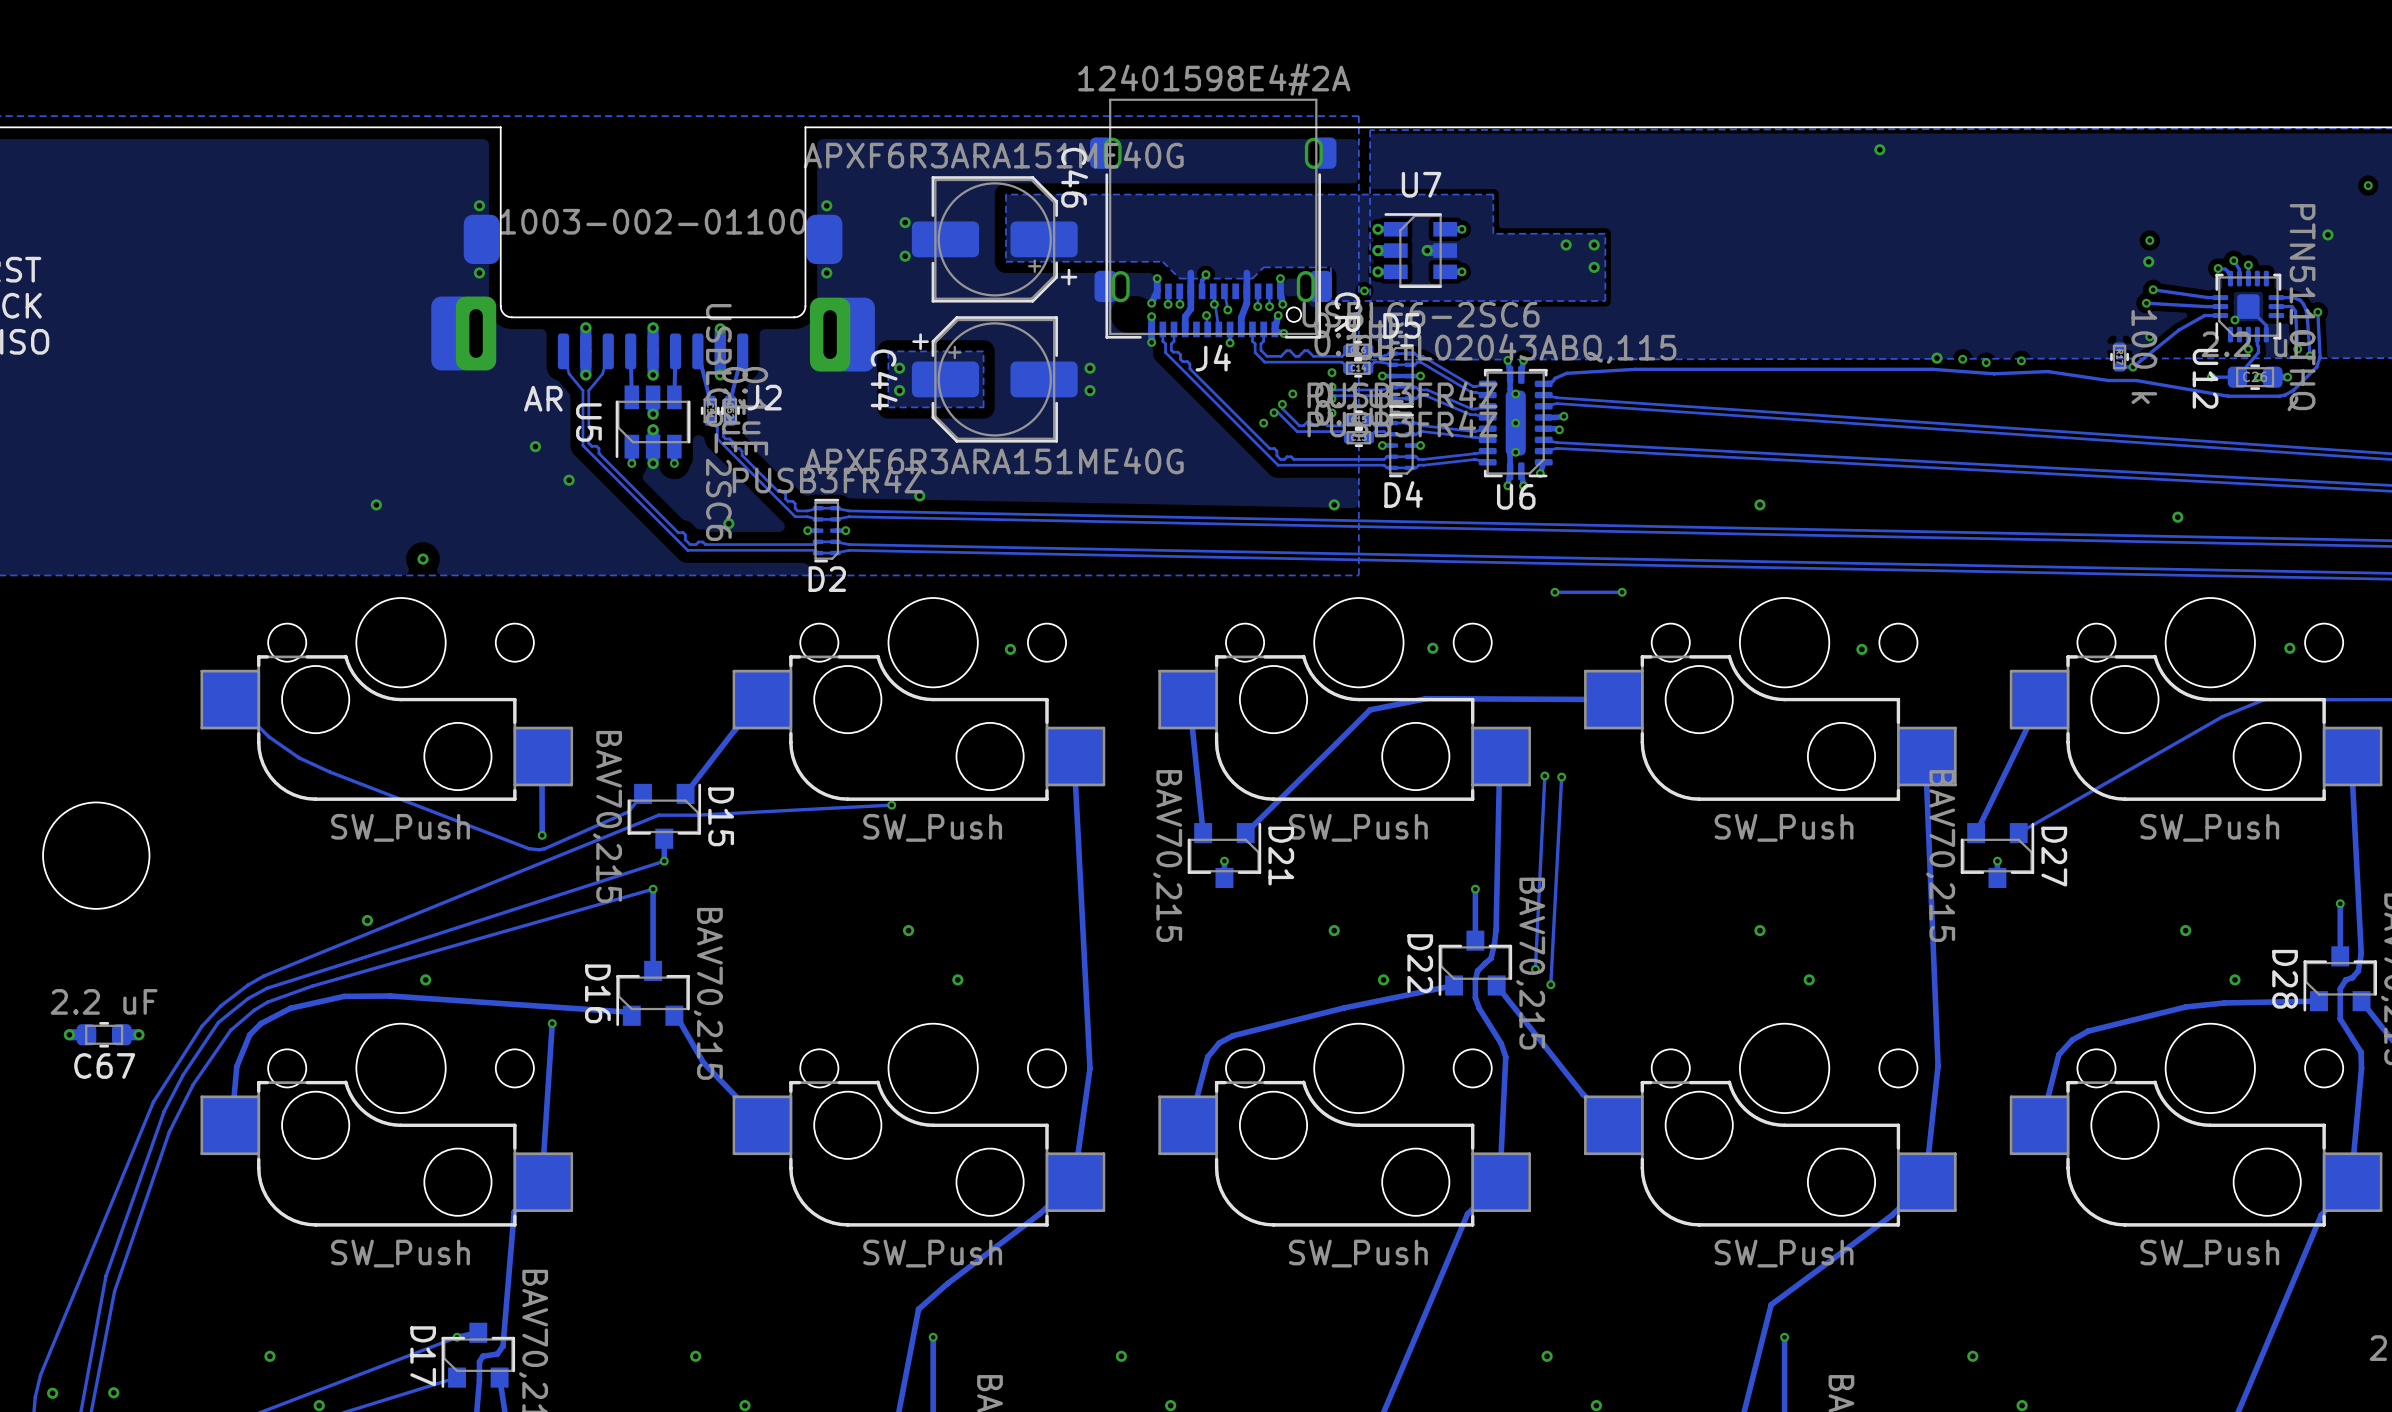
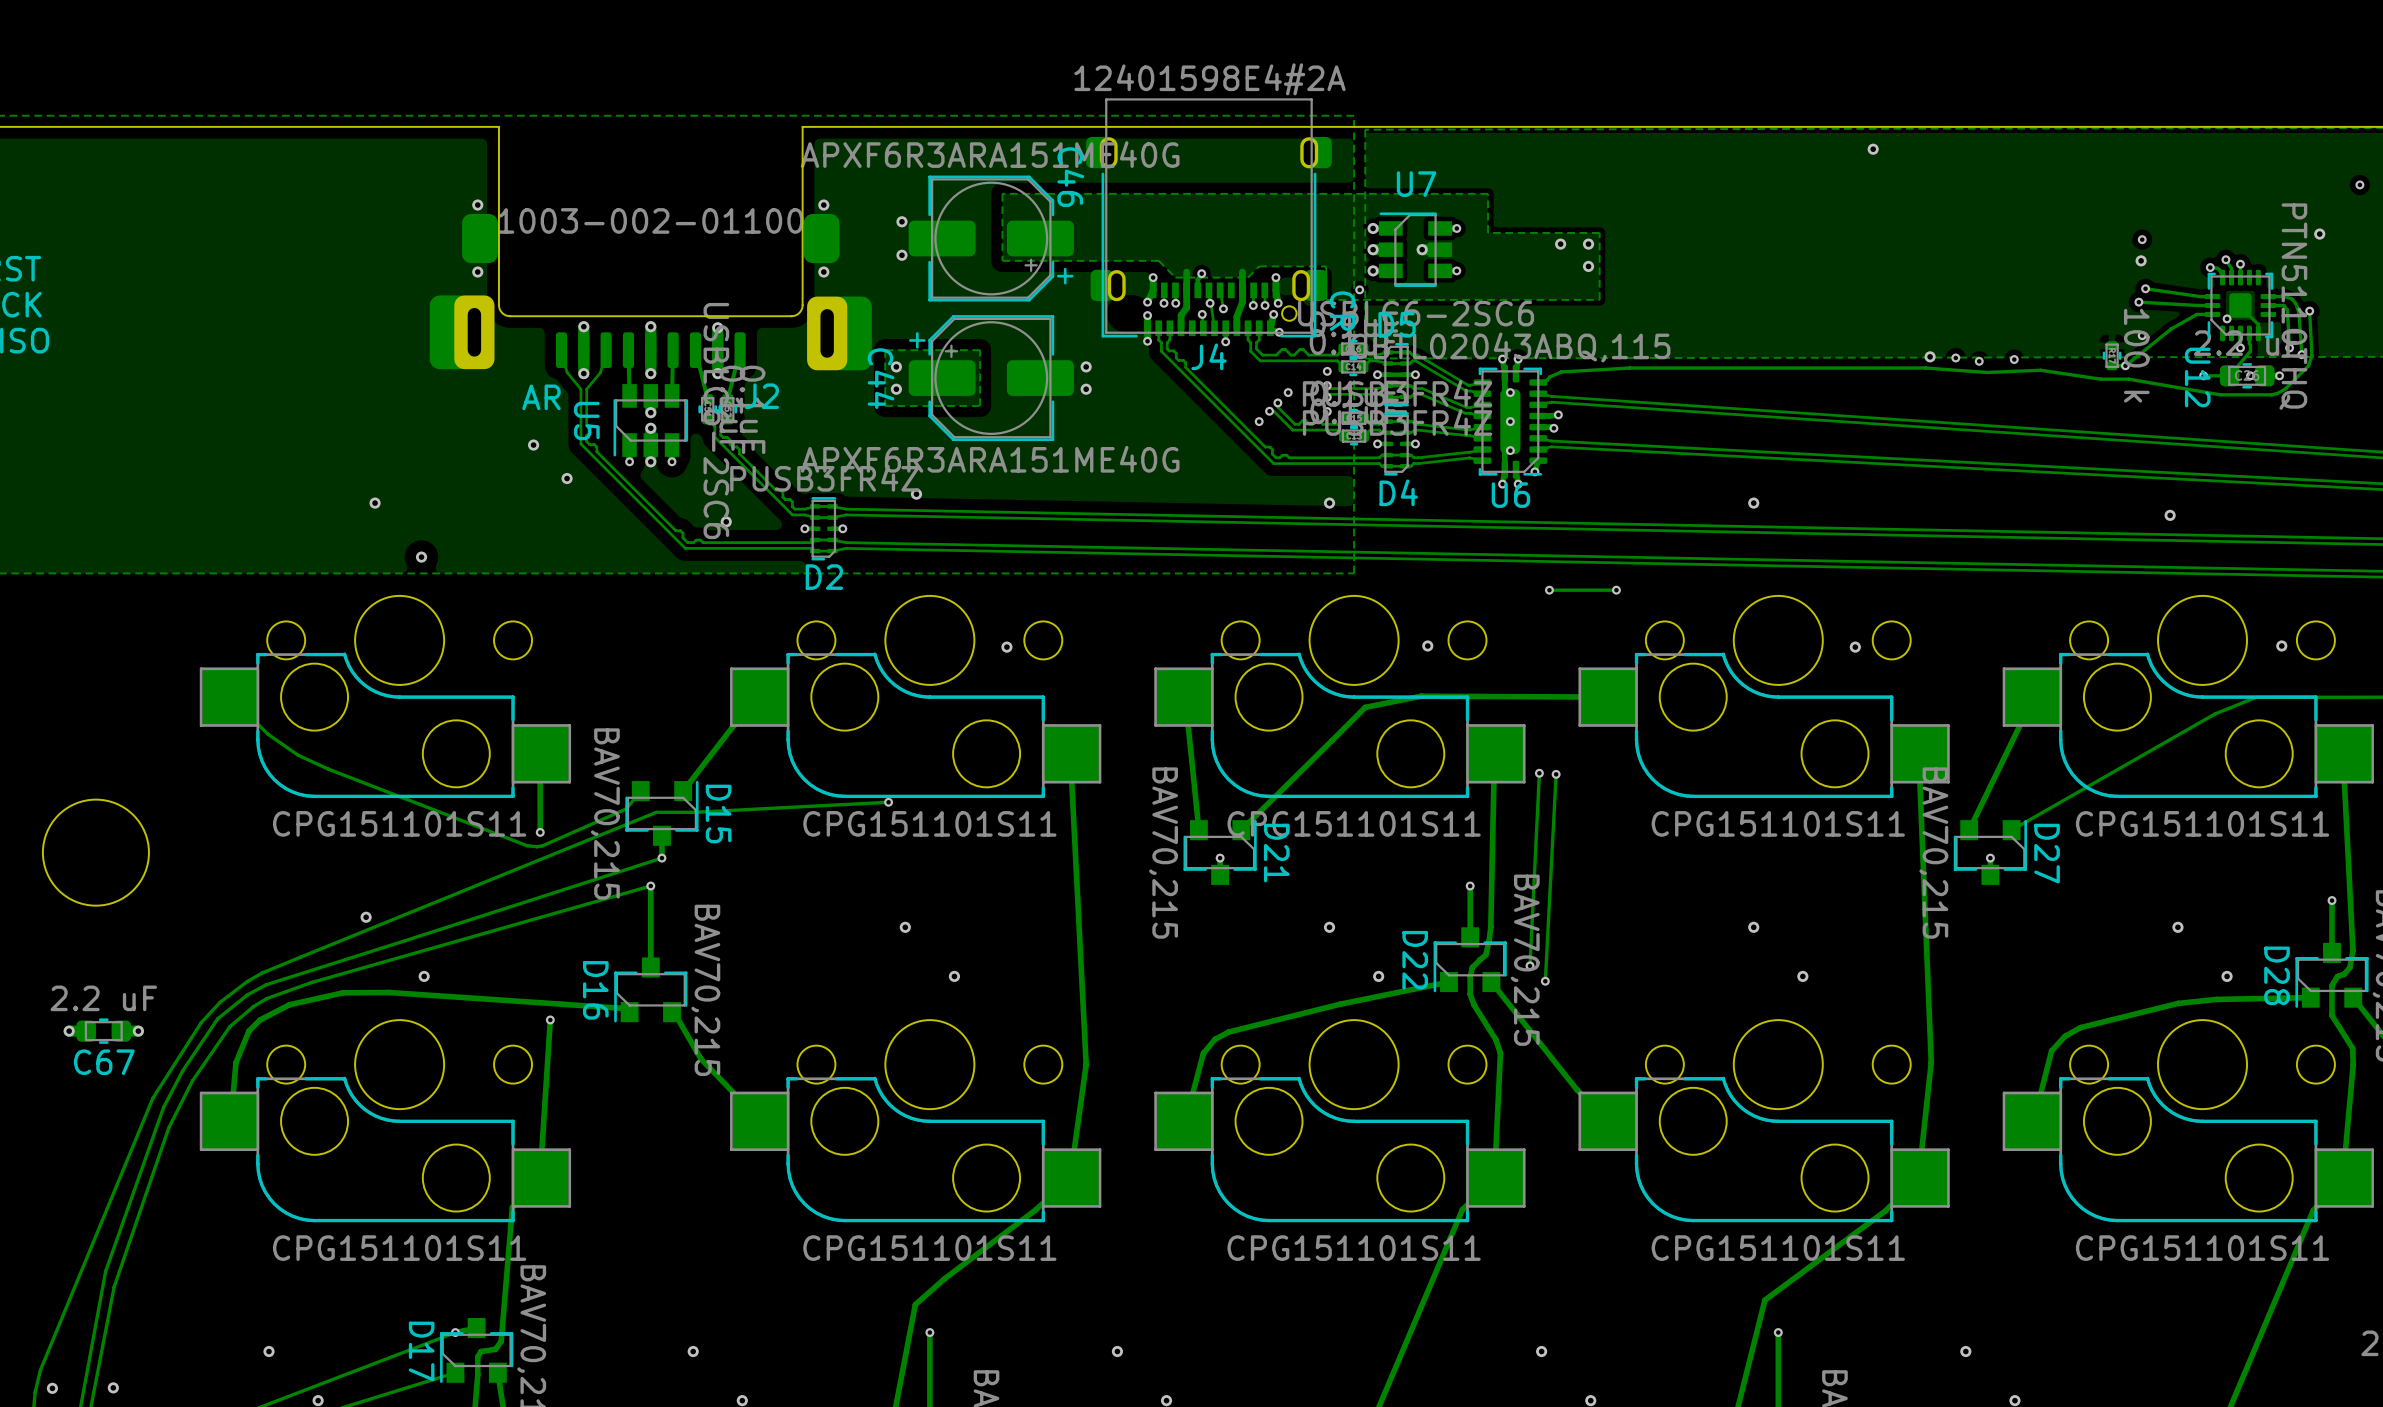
part value: SW_Push (400, 827) -> CPG151101S11 (399, 823)
part value: SW_Push (932, 827) -> CPG151101S11 (929, 823)
part value: SW_Push (1358, 827) -> CPG151101S11 (1354, 823)
part value: SW_Push (1784, 827) -> CPG151101S11 (1778, 823)
part value: SW_Push (2209, 827) -> CPG151101S11 (2202, 823)
part value: SW_Push (400, 1253) -> CPG151101S11 (399, 1248)
part value: SW_Push (932, 1253) -> CPG151101S11 (929, 1248)
part value: SW_Push (1358, 1253) -> CPG151101S11 (1354, 1248)
part value: SW_Push (1784, 1253) -> CPG151101S11 (1778, 1248)
part value: SW_Push (2209, 1253) -> CPG151101S11 (2202, 1248)

